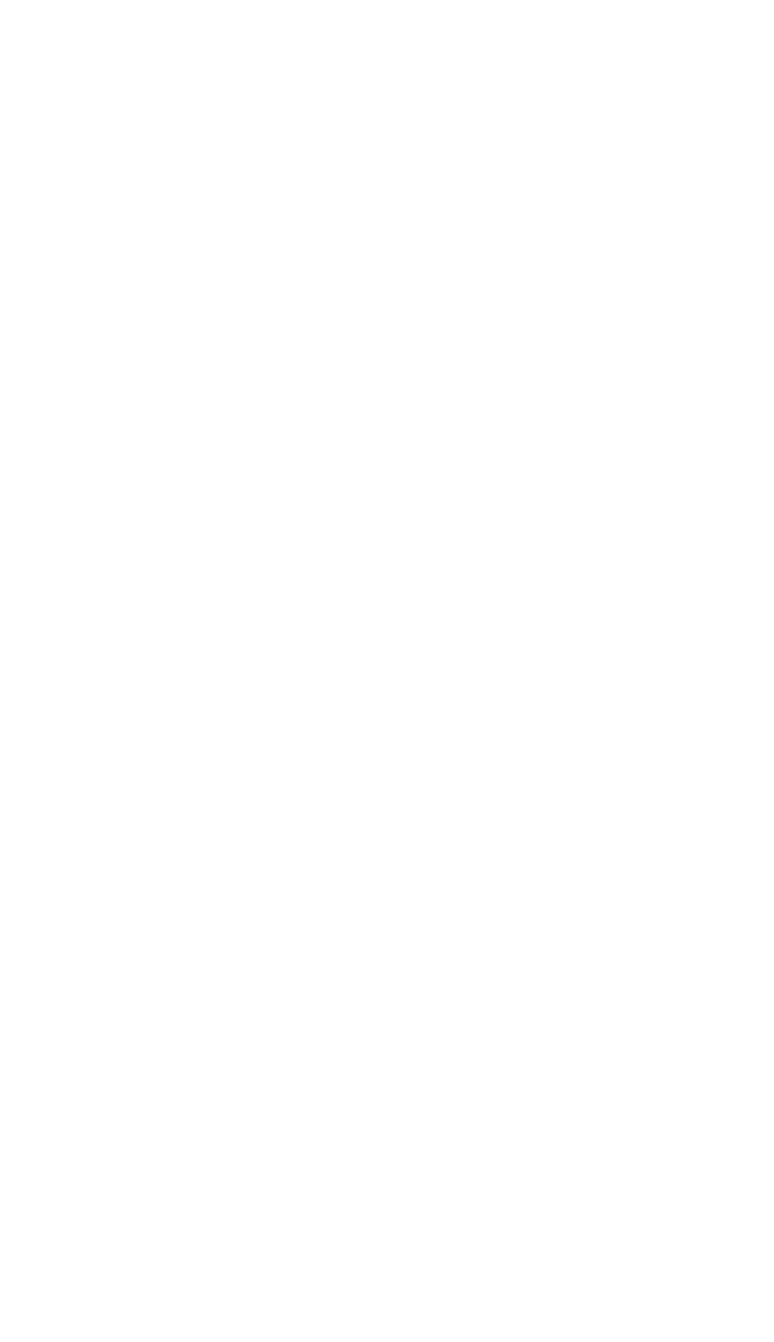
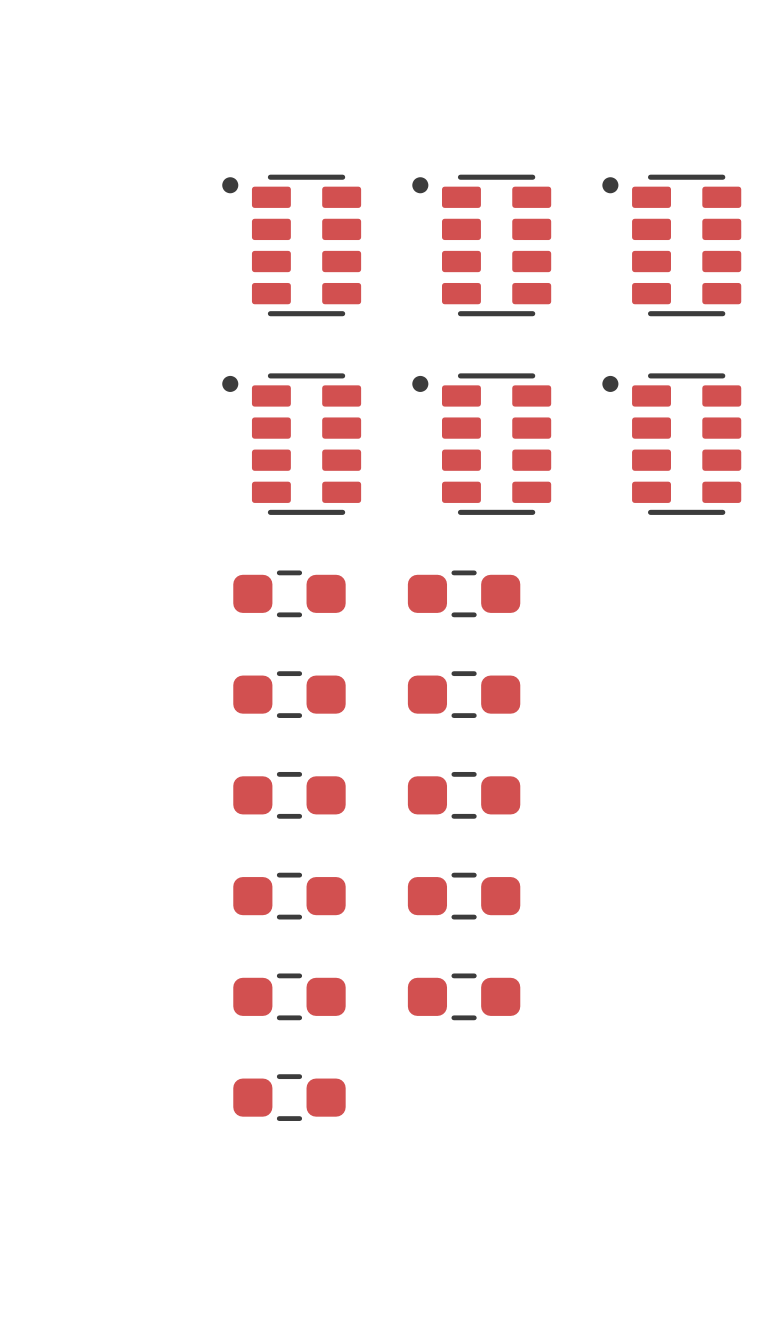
part: none -> (291, 245)
part: none -> (481, 245)
part: none -> (671, 245)
part: none -> (291, 444)
part: none -> (481, 444)
part: none -> (671, 444)
part: none -> (289, 593)
part: none -> (464, 593)
part: none -> (289, 694)
part: none -> (464, 694)
part: none -> (289, 795)
part: none -> (464, 795)
part: none -> (289, 896)
part: none -> (464, 896)
part: none -> (289, 996)
part: none -> (464, 996)
part: none -> (289, 1097)

